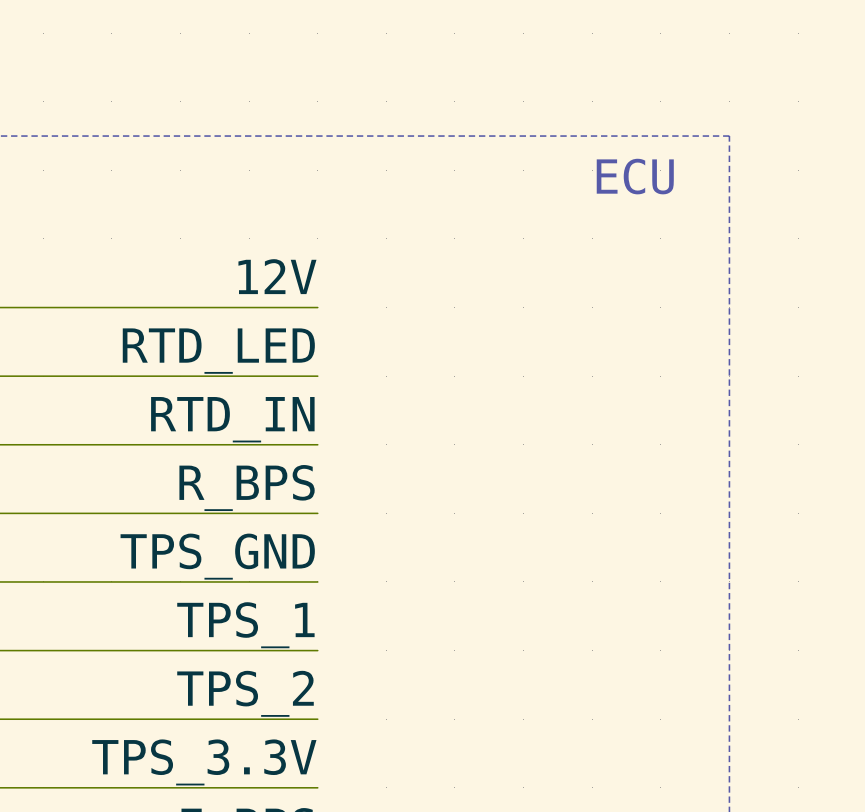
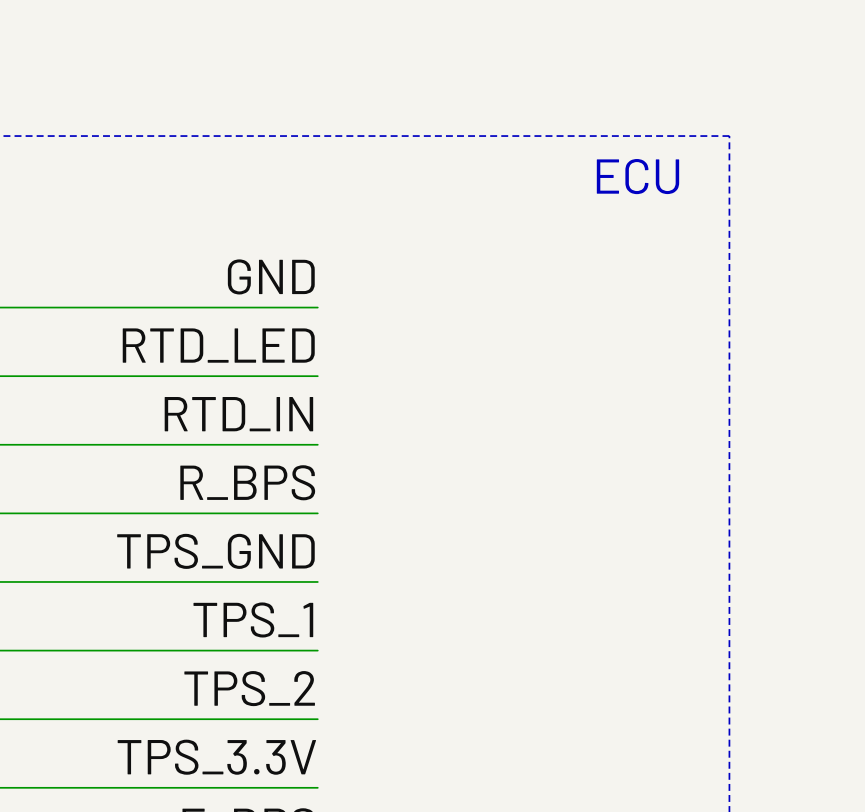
label: 12V (277, 276) -> GND (271, 276)

